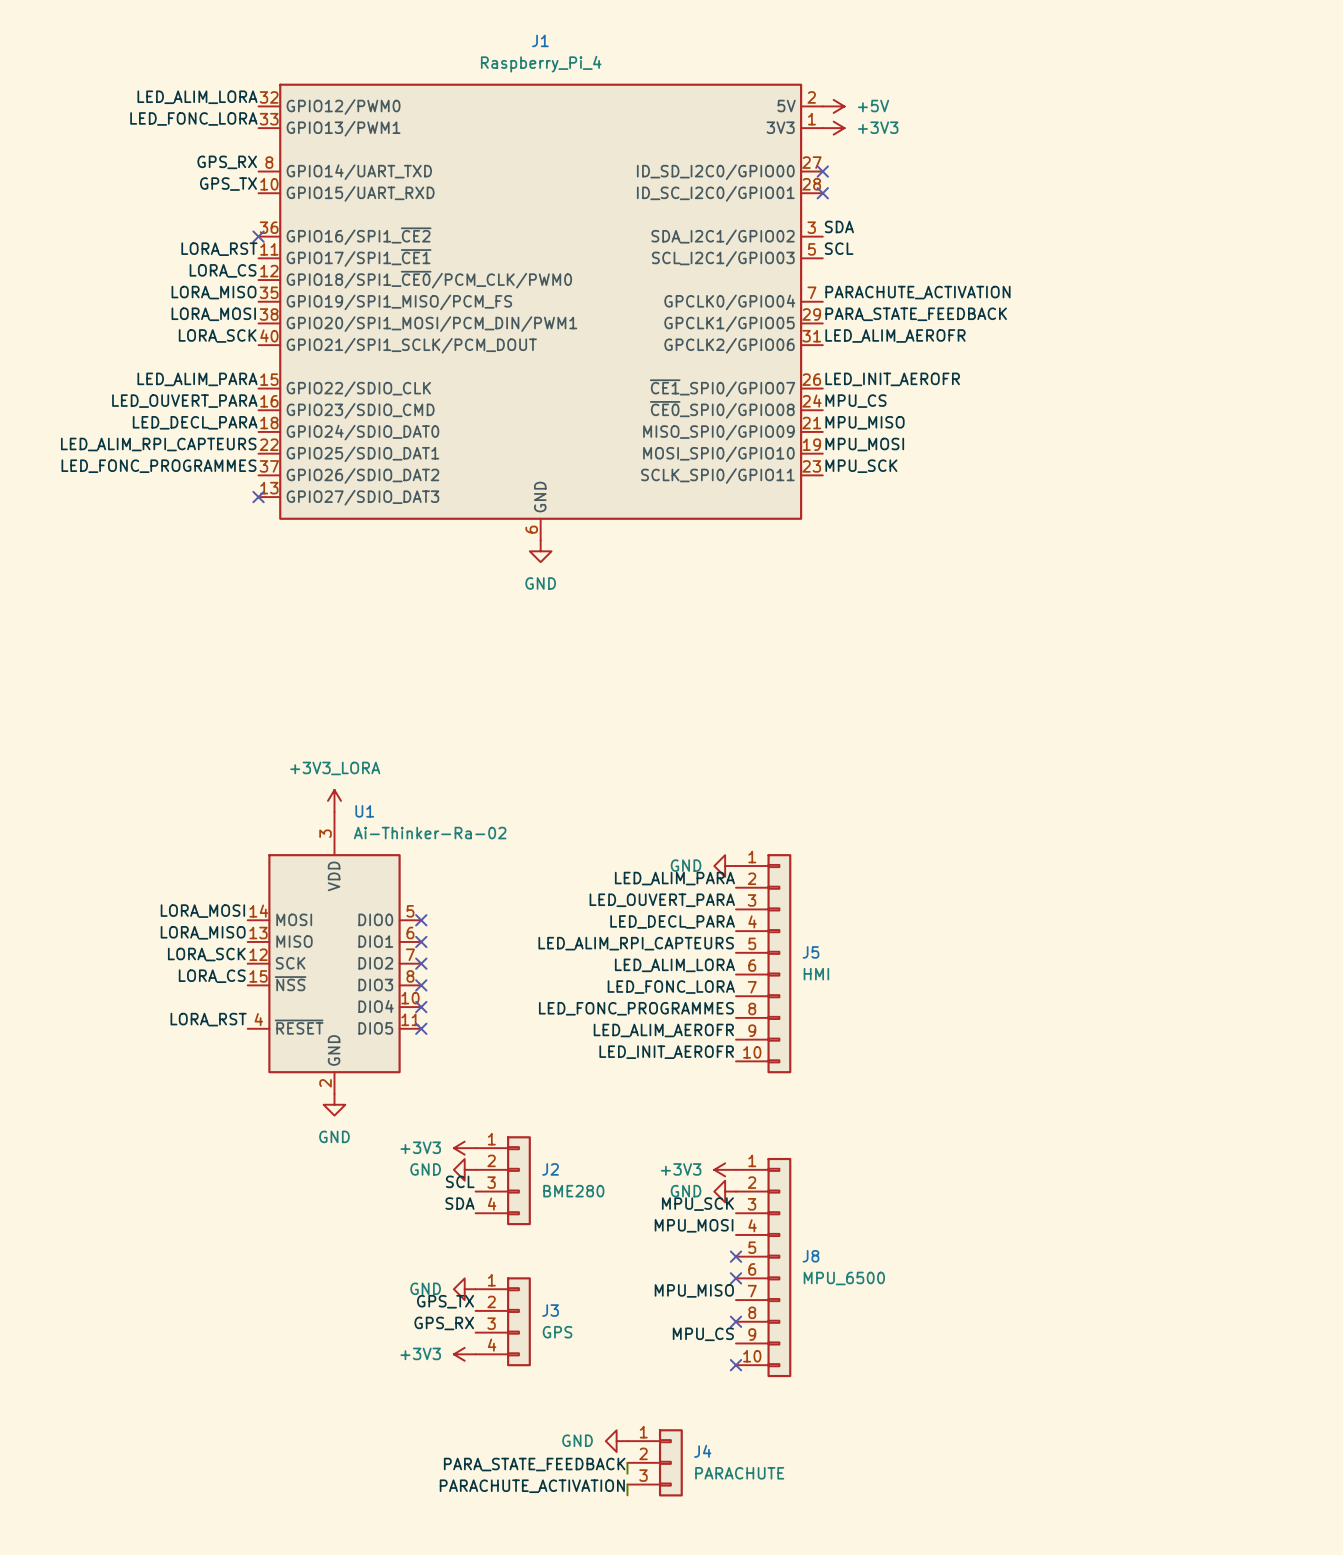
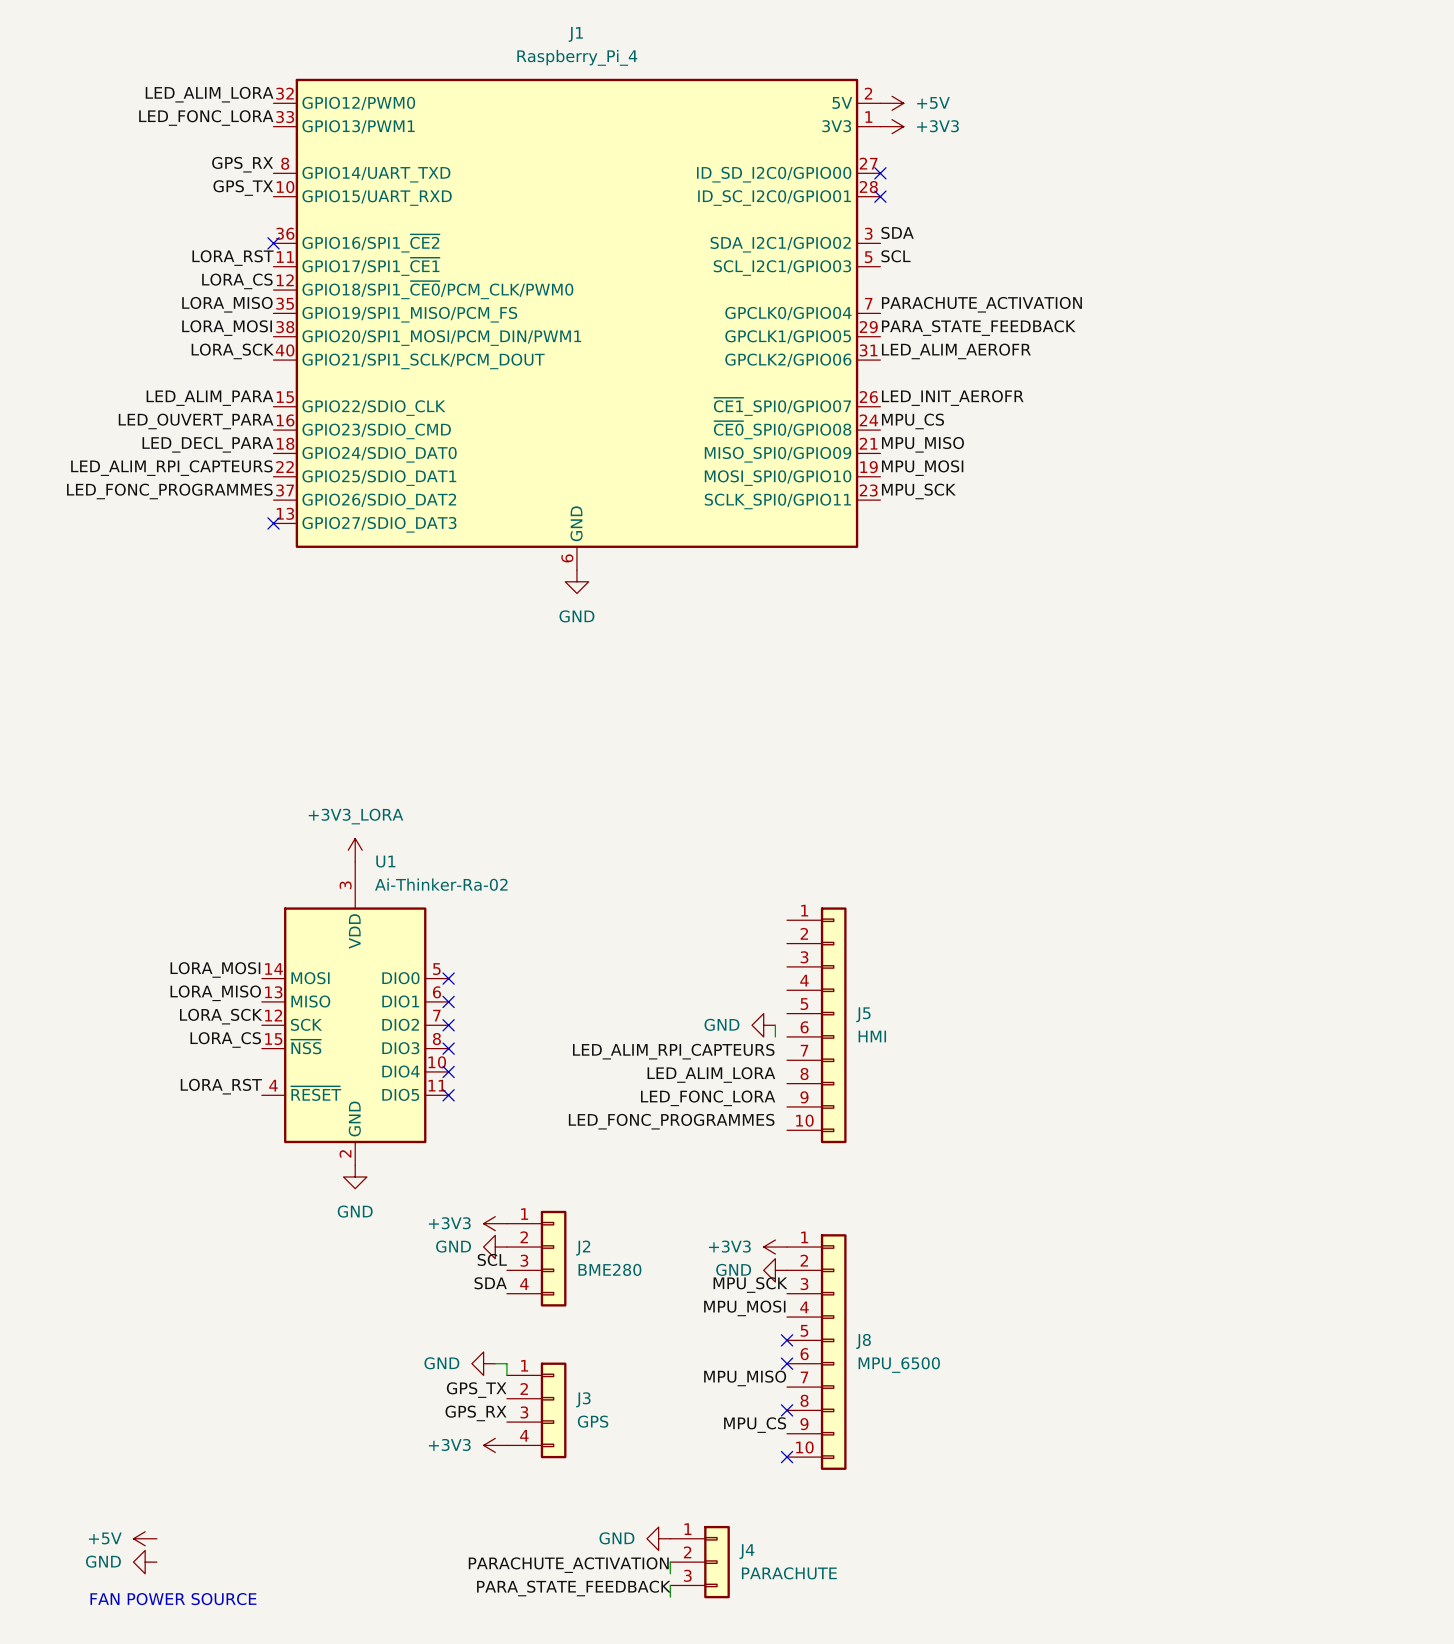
power symbol position: GND (725, 866) -> GND (763, 1025)
label: LED_ALIM_PARA (674, 878) -> none
label: LED_OUVERT_PARA (662, 900) -> none
label: LED_DECL_PARA (672, 921) -> none
label position: LED_ALIM_RPI_CAPTEURS (636, 943) -> LED_ALIM_RPI_CAPTEURS (673, 1051)
wire: none -> (775, 1025) (775, 1036)
label position: LED_ALIM_LORA (674, 965) -> LED_ALIM_LORA (711, 1074)
label position: LED_FONC_LORA (671, 987) -> LED_FONC_LORA (708, 1098)
label position: LED_FONC_PROGRAMMES (636, 1008) -> LED_FONC_PROGRAMMES (671, 1121)
label: LED_ALIM_AEROFR (663, 1030) -> none
label: LED_INIT_AEROFR (666, 1052) -> none
wire: none -> (495, 1363) (506, 1363) (506, 1375)
power symbol position: GND (464, 1289) -> GND (483, 1363)
power symbol: none -> +5V (145, 1538)
power symbol: none -> GND (145, 1562)
label: PARA_STATE_FEEDBACK (534, 1464) -> PARACHUTE_ACTIVATION (568, 1565)
label: PARACHUTE_ACTIVATION (532, 1486) -> PARA_STATE_FEEDBACK (573, 1588)
text: none -> FAN POWER SOURCE (173, 1599)

